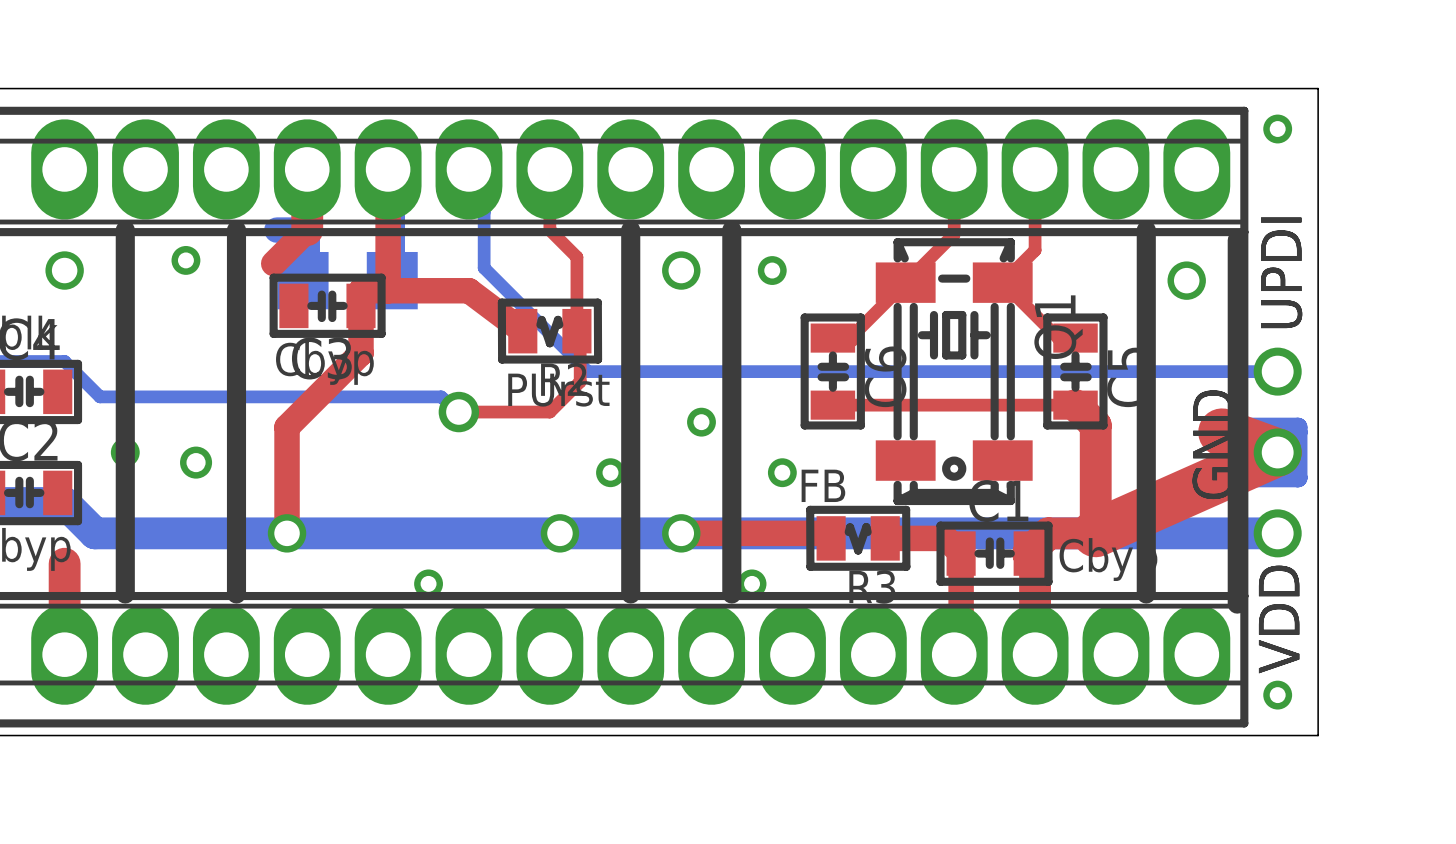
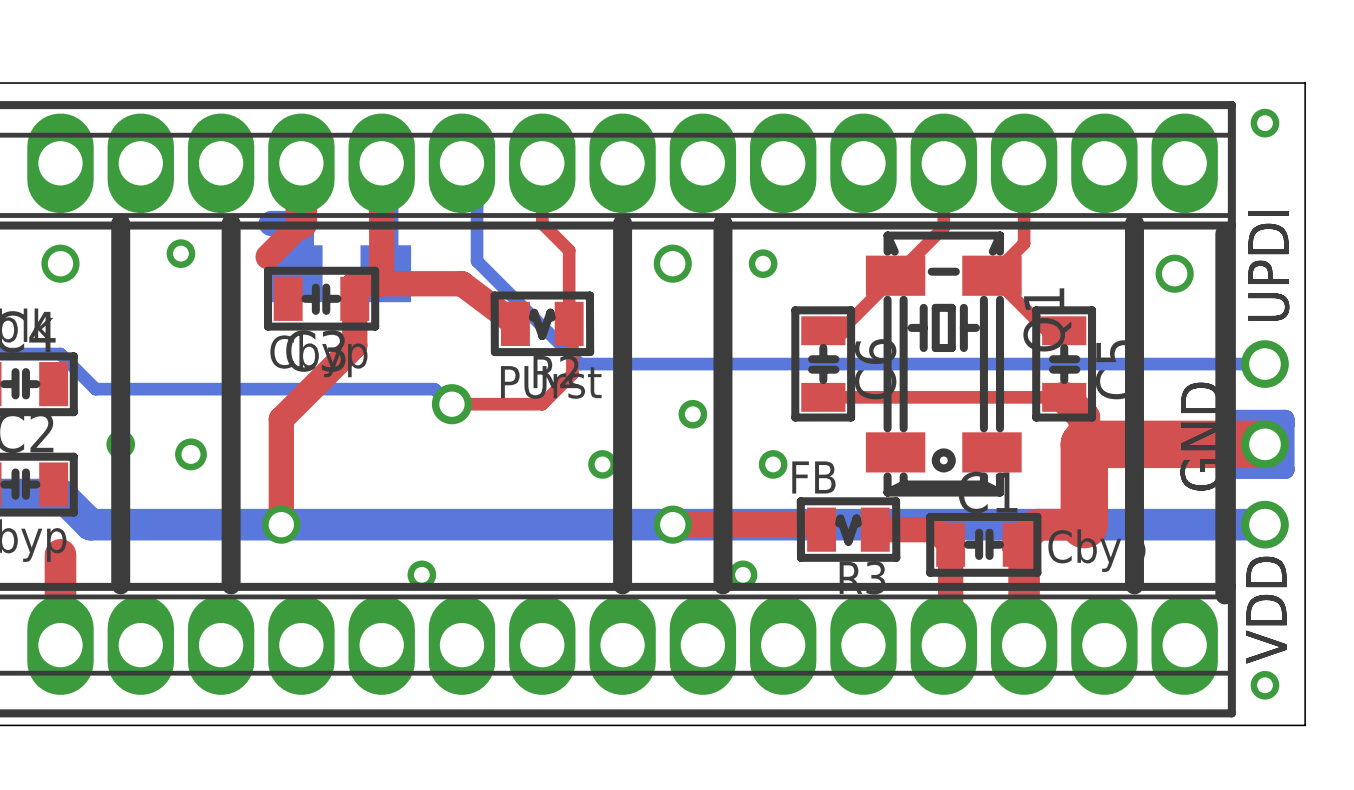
top track: (1222, 432) (1277, 452) (1095, 533) -> (1264, 444) (1084, 444) (1084, 524)
via: (559, 533) -> none

